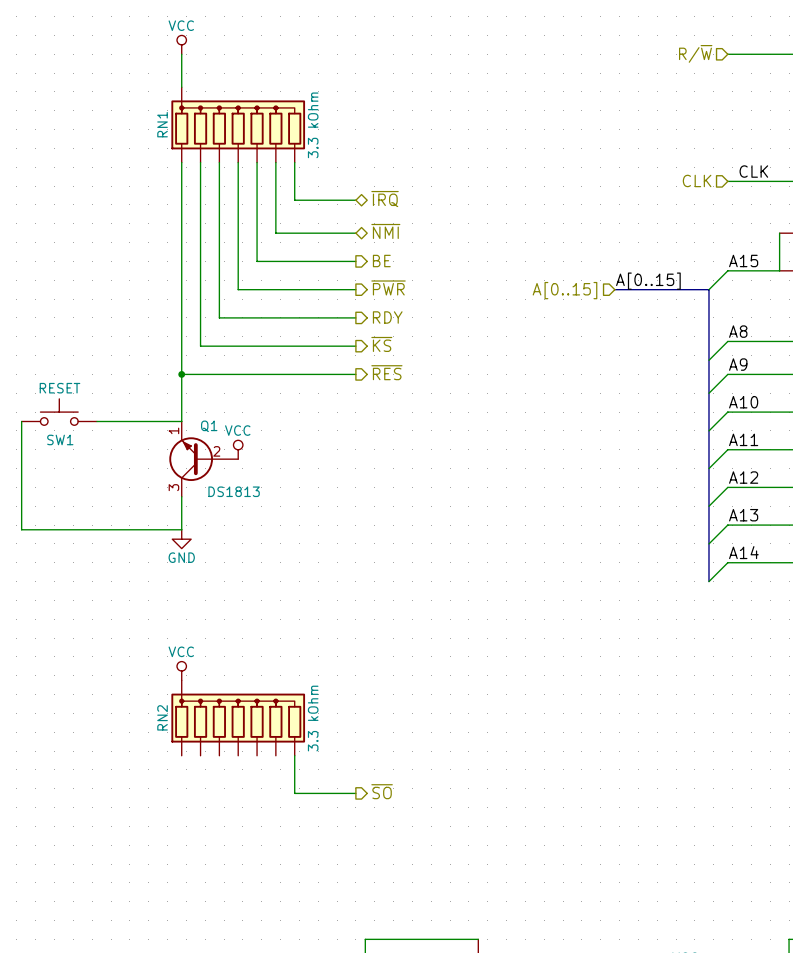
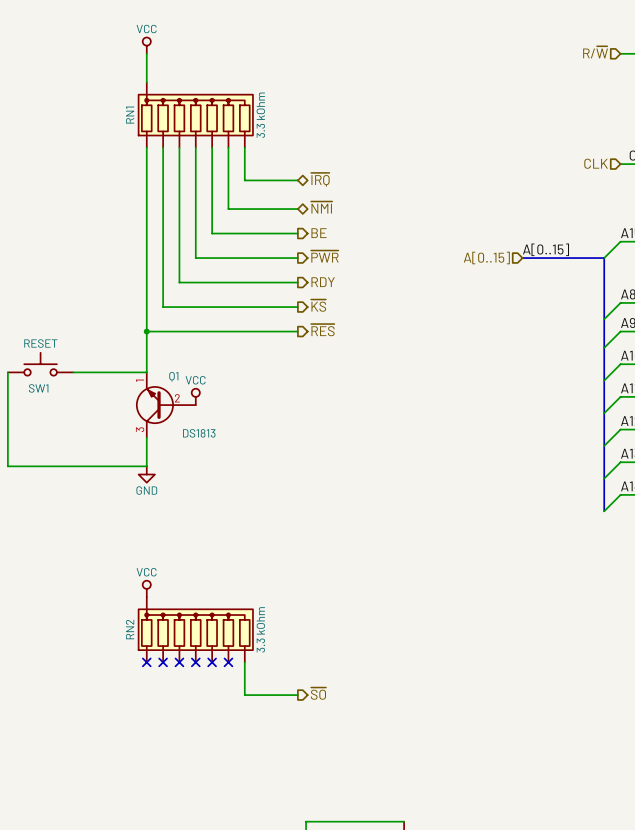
no-connect mark: none -> (146, 662)
no-connect mark: none -> (163, 662)
no-connect mark: none -> (179, 662)
no-connect mark: none -> (195, 662)
no-connect mark: none -> (212, 662)
no-connect mark: none -> (228, 662)

